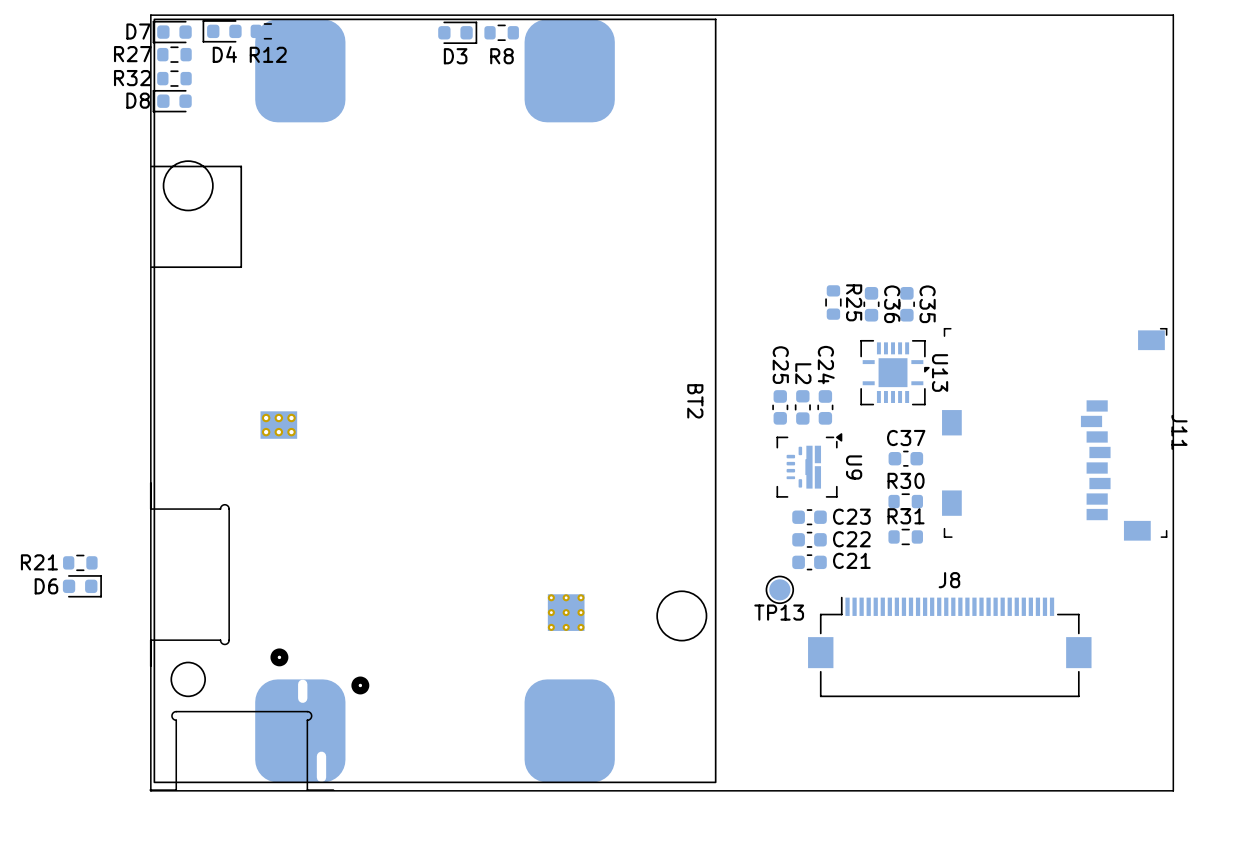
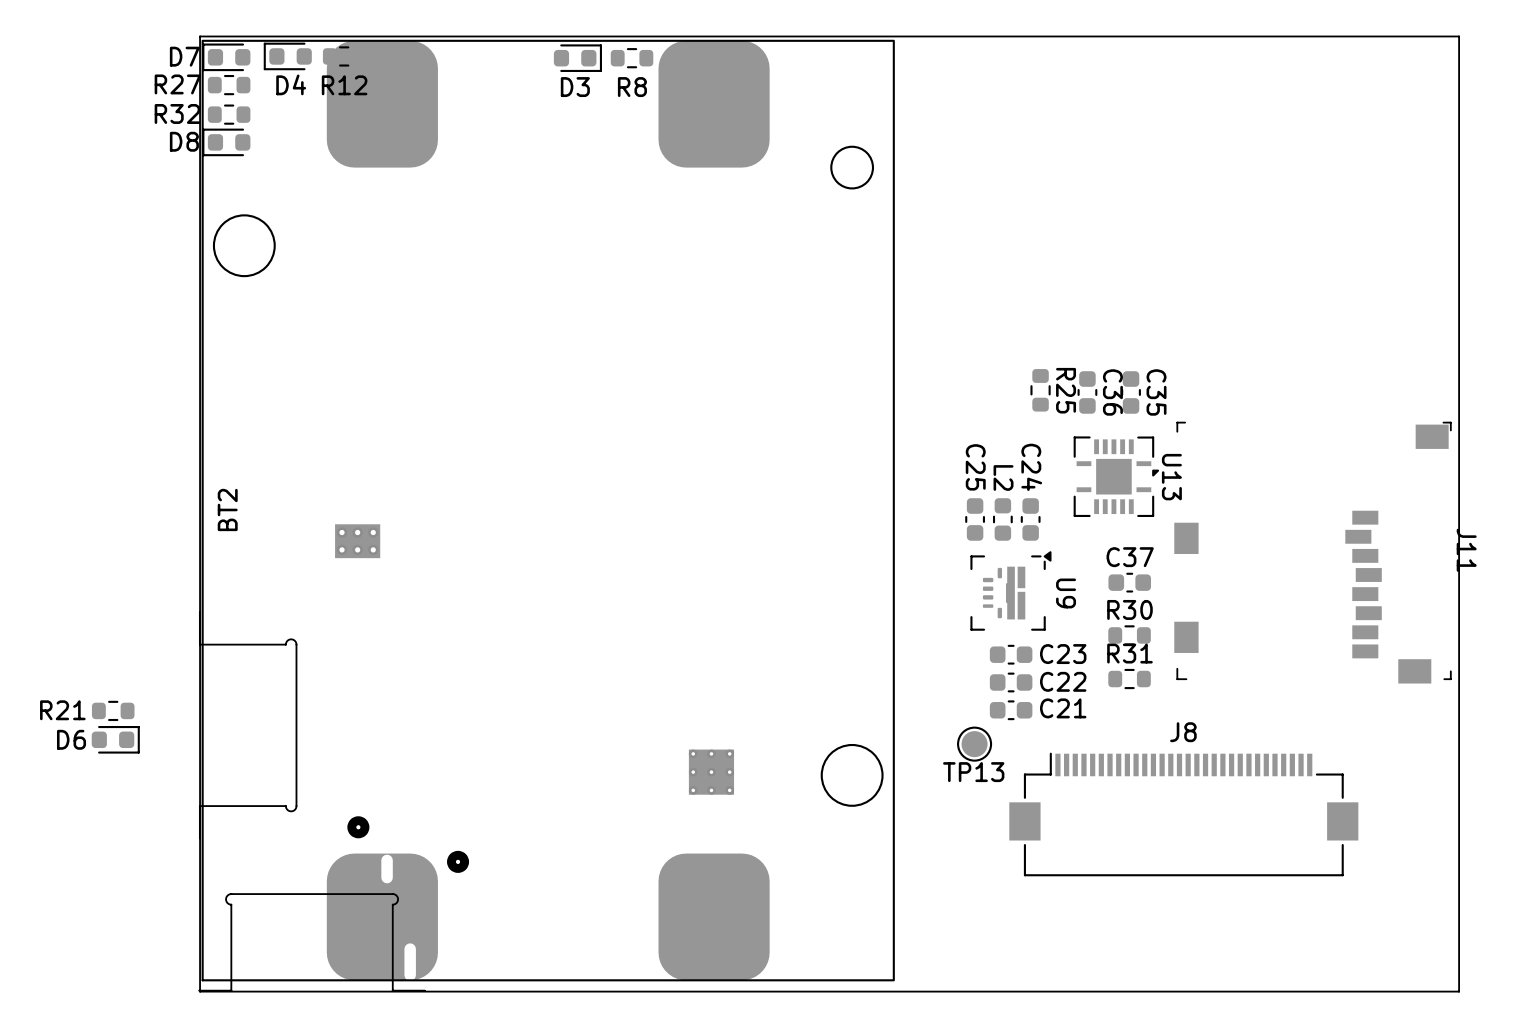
part: (196, 216) -> none
BT2 rotation: 0° (435, 400) -> 180° (548, 510)

